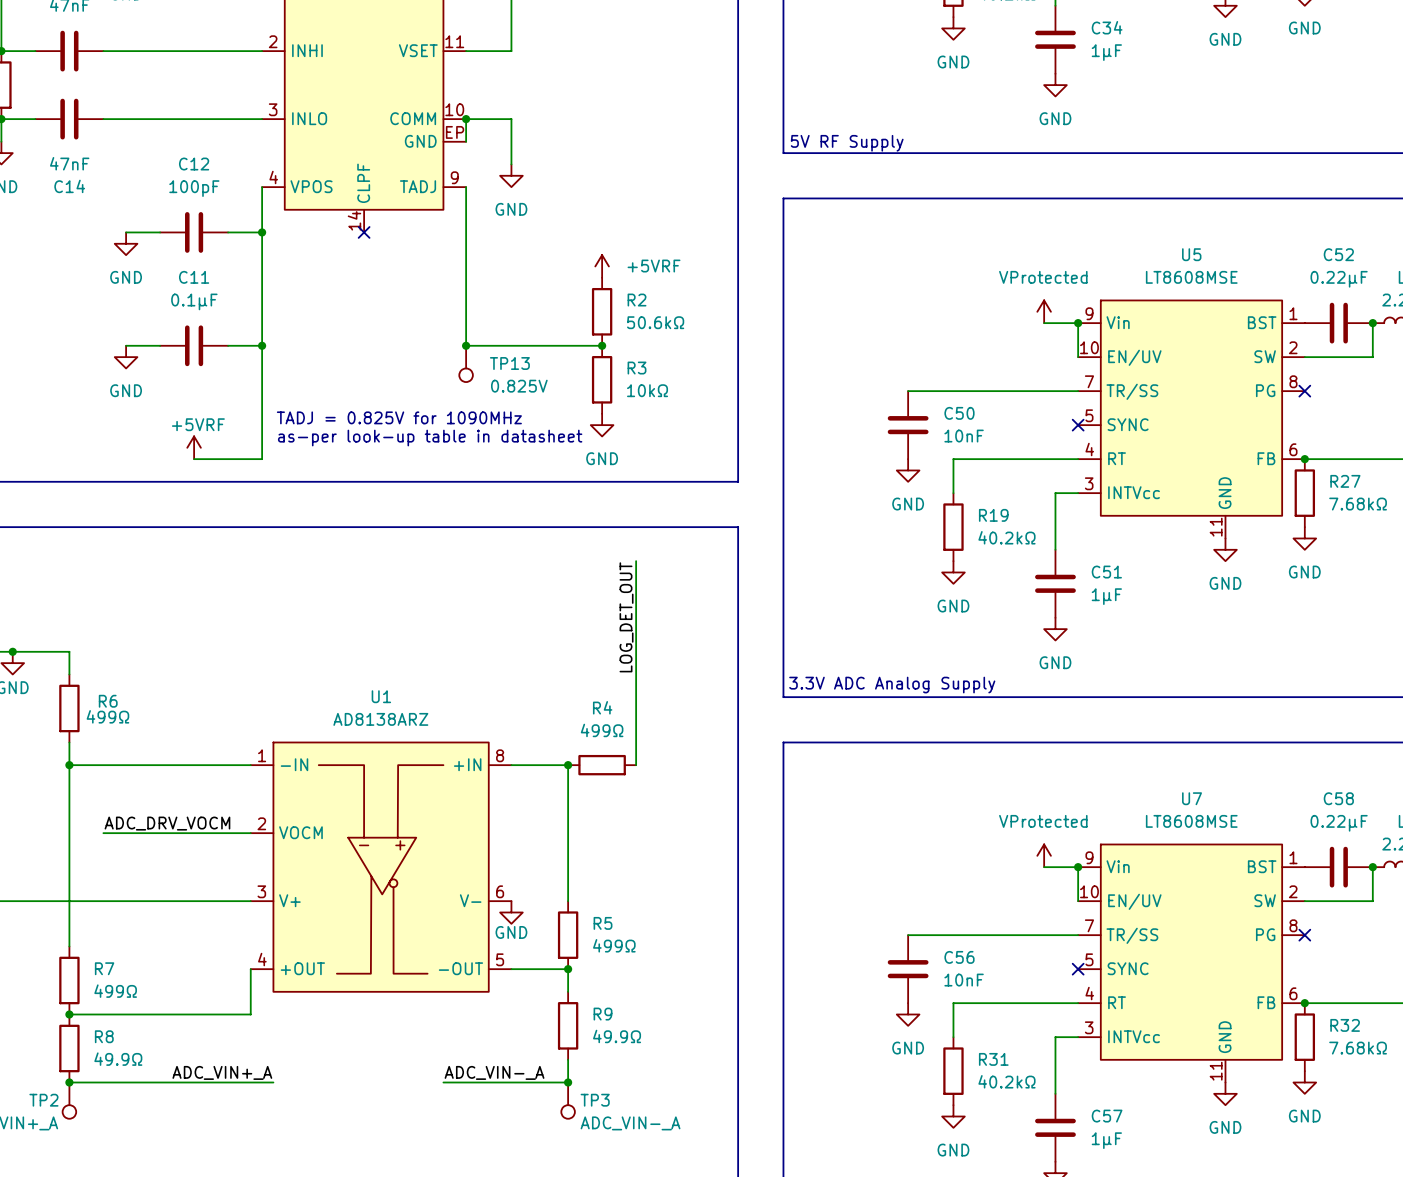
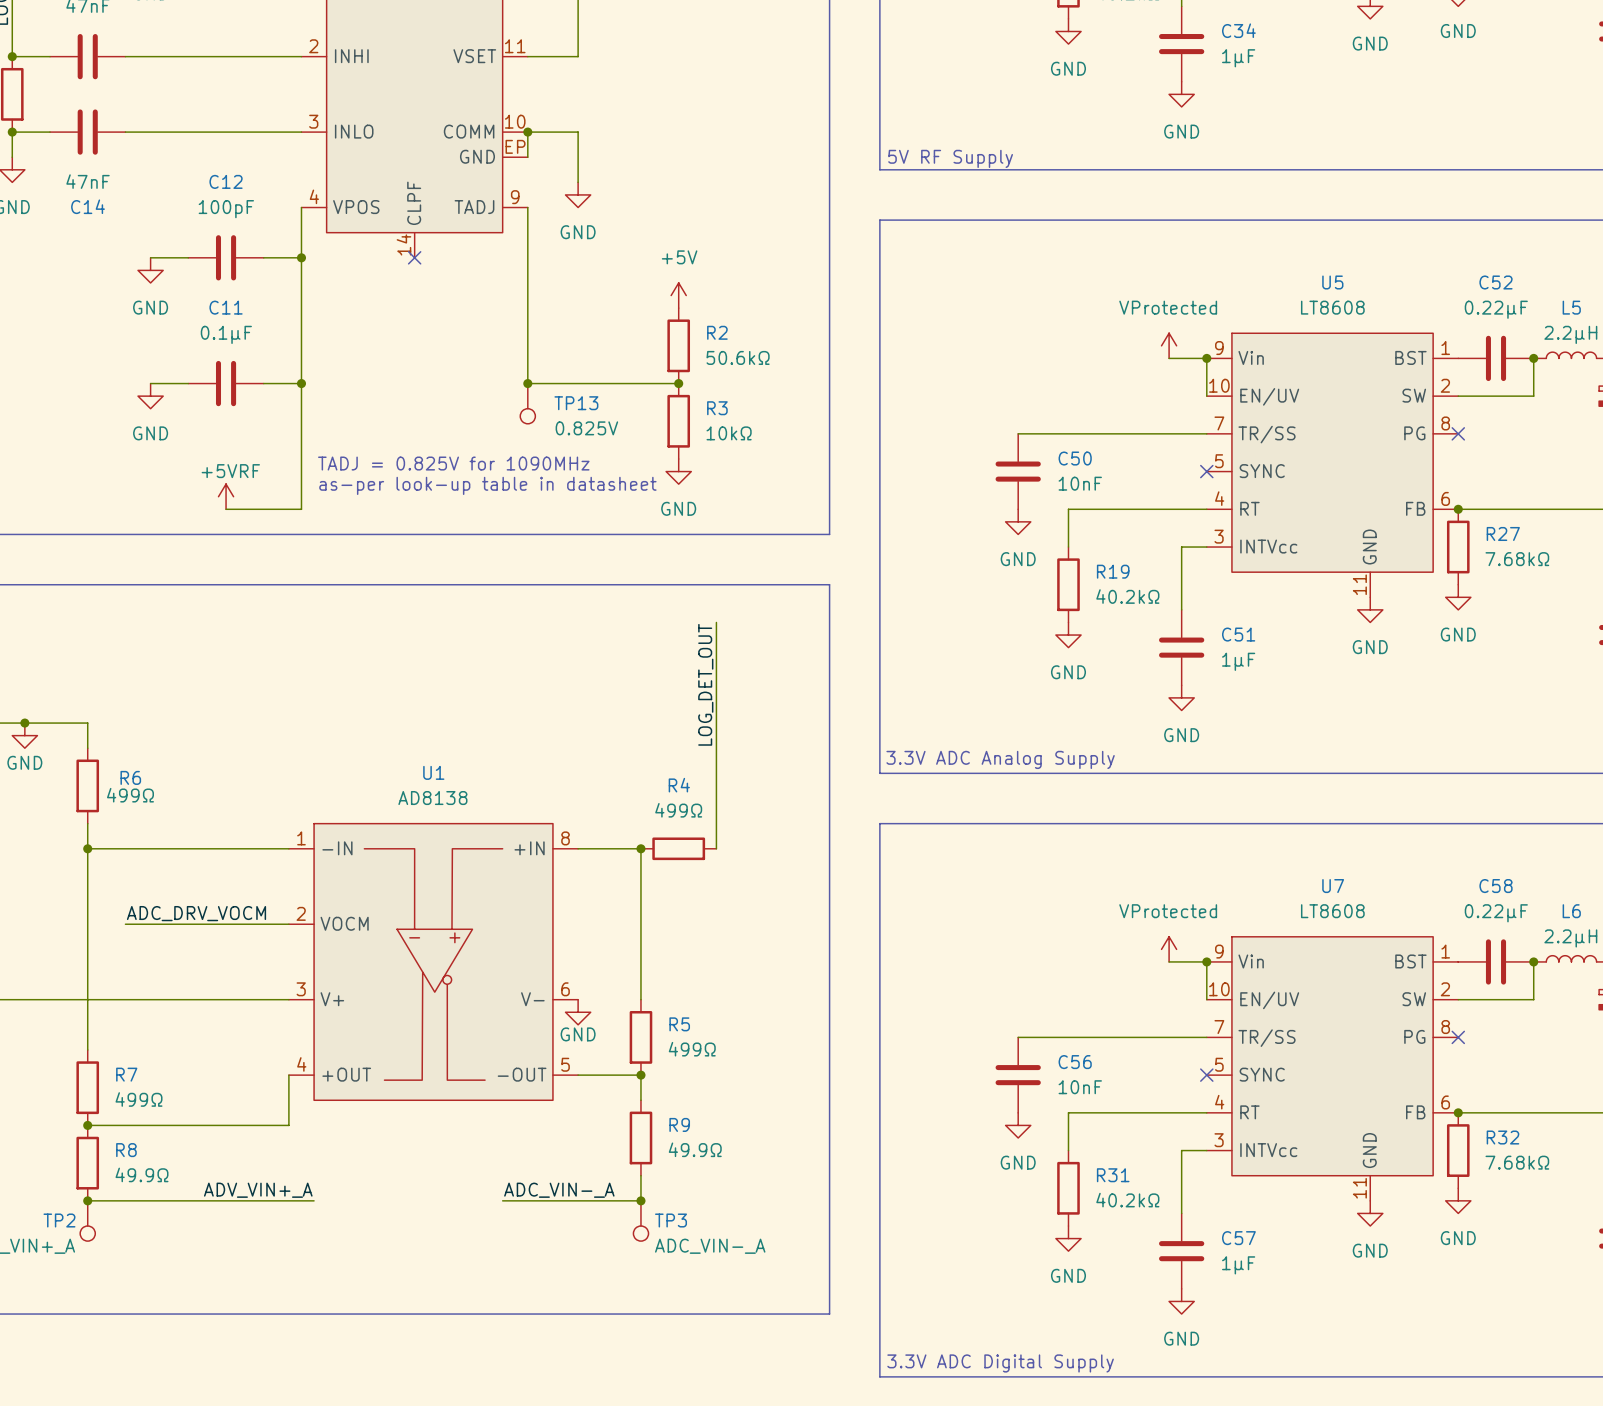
power symbol: +5VRF (602, 266) -> +5V (678, 295)
U5 value: LT8608MSE (1191, 277) -> LT8608 (1332, 307)
U1 value: AD8138ARZ (380, 719) -> AD8138 (432, 798)
U7 value: LT8608MSE (1191, 821) -> LT8608 (1332, 911)
label: ADC_VIN+_A (222, 1072) -> ADV_VIN+_A (258, 1190)

